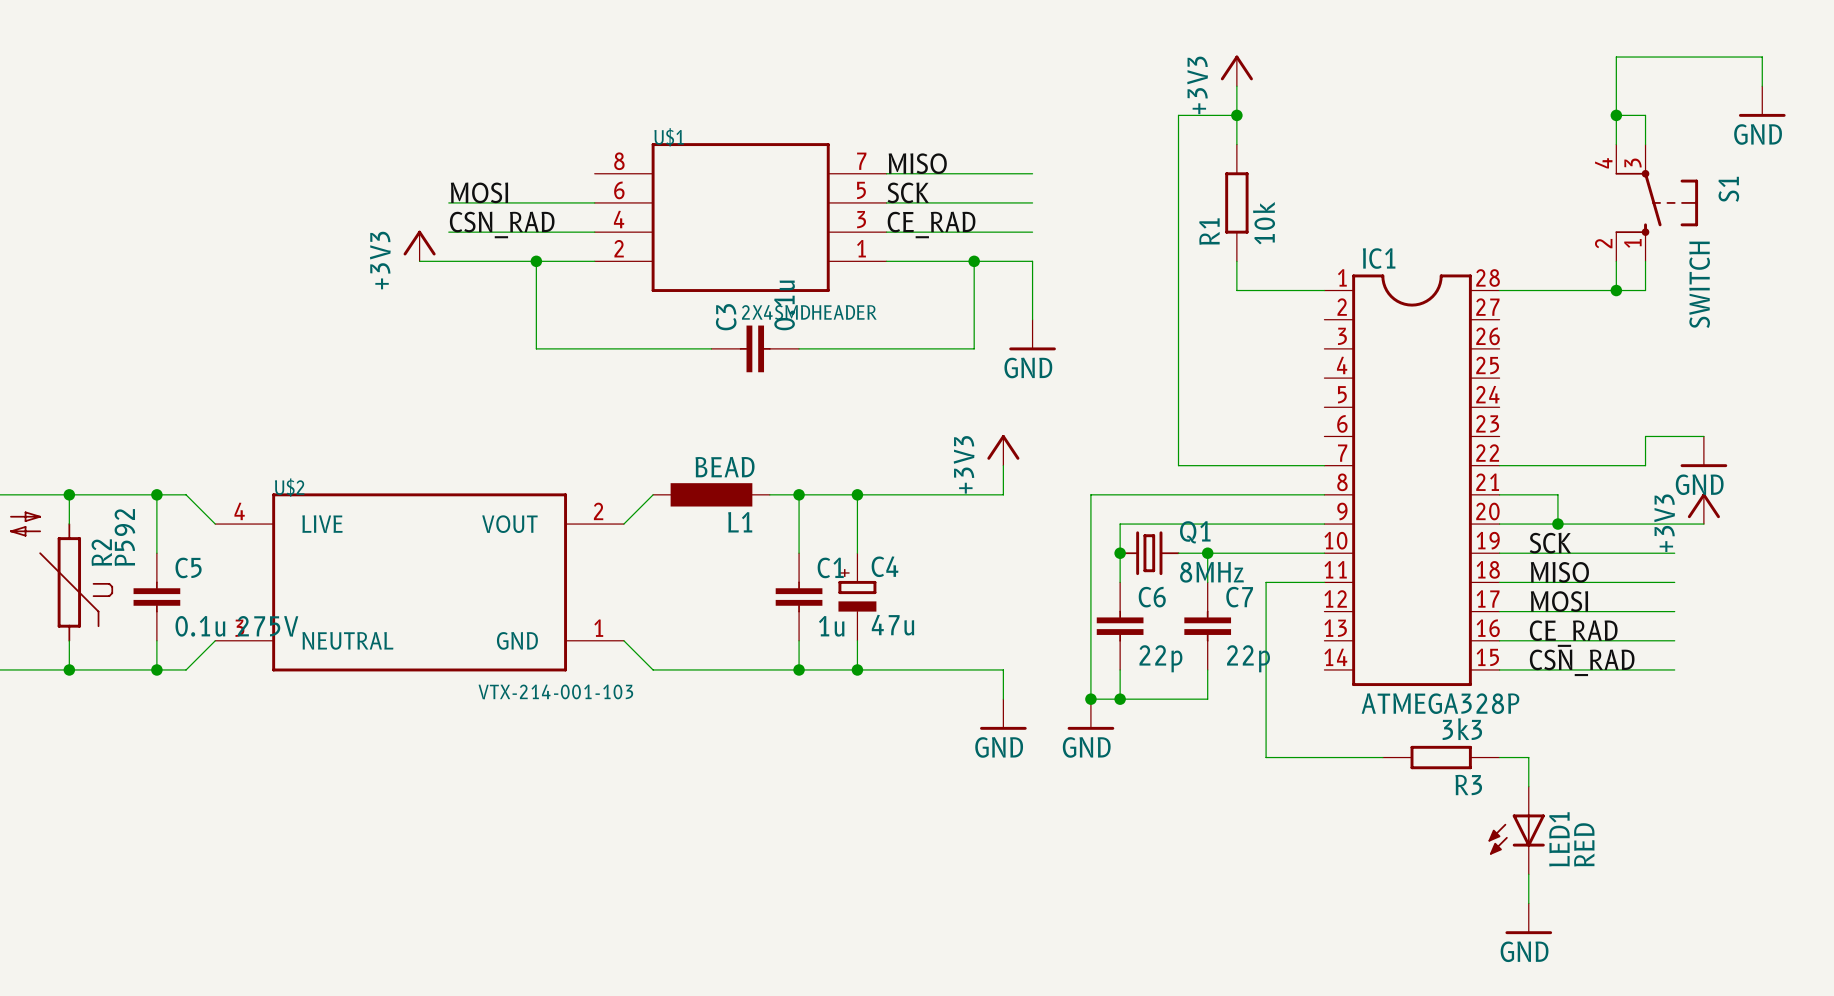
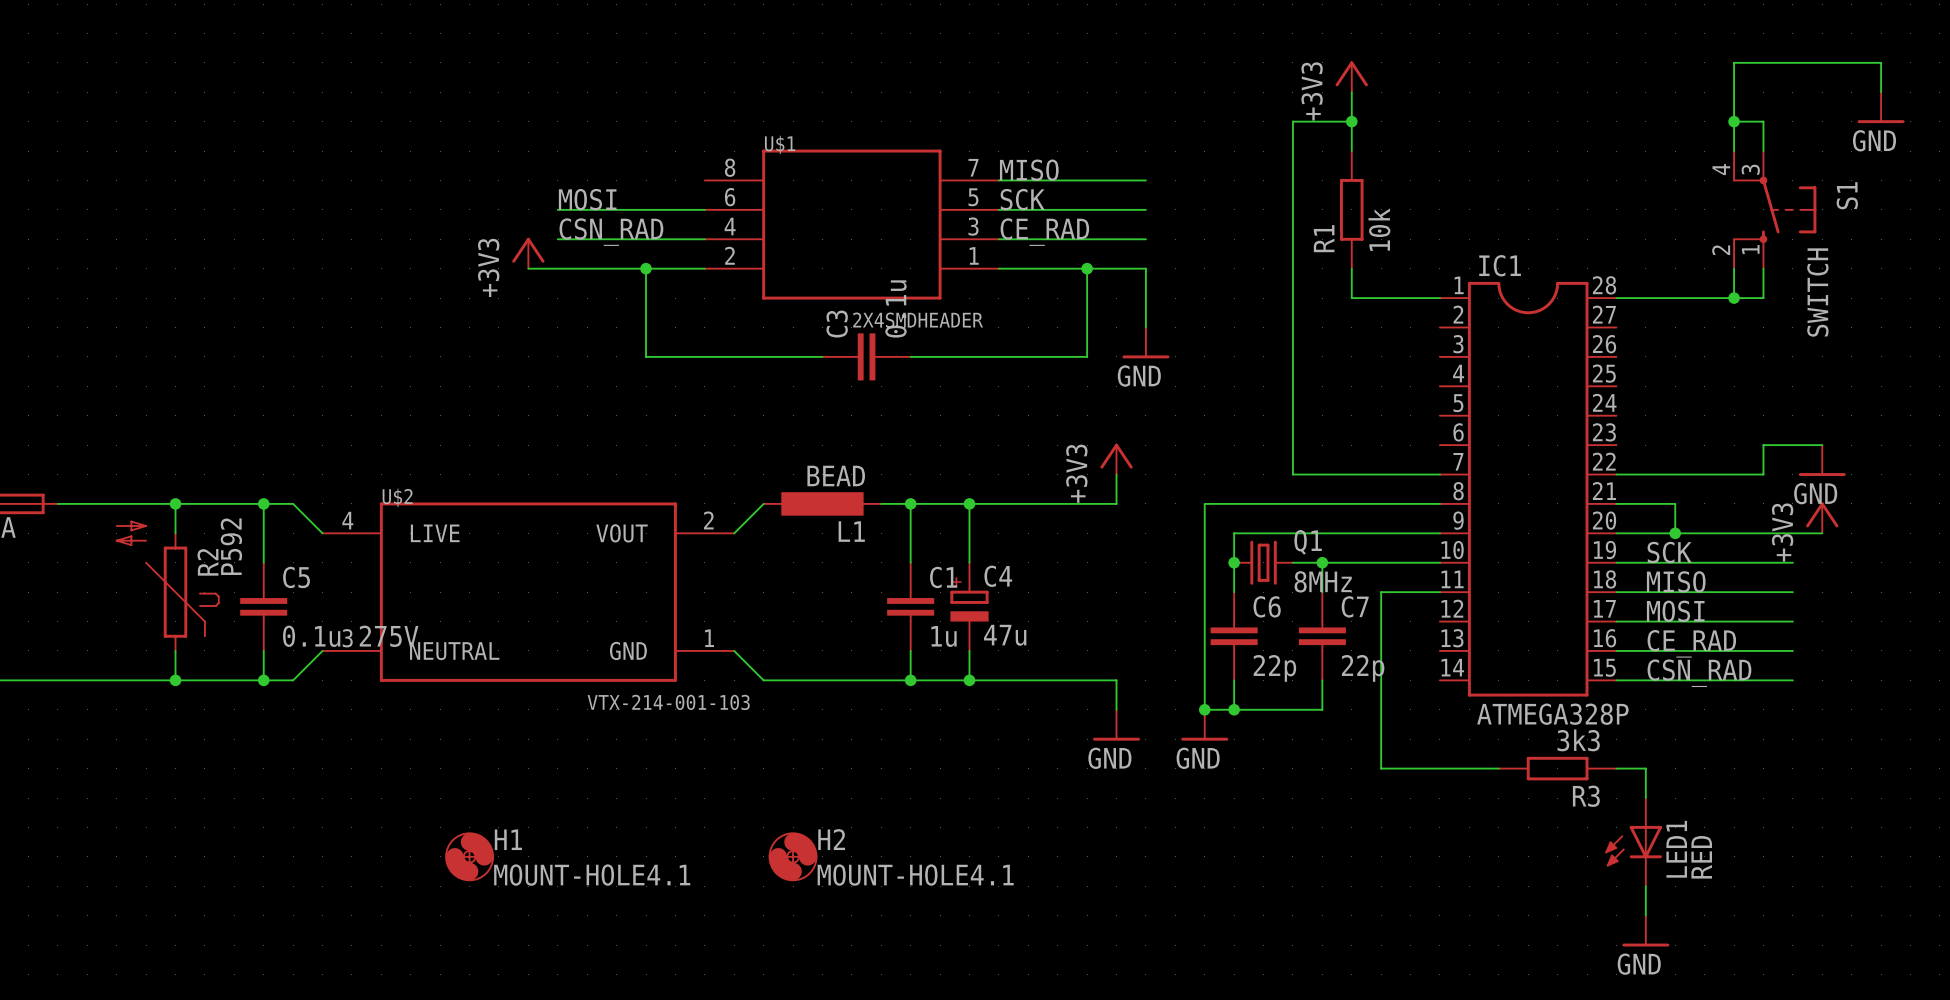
H1: none -> MOUNT-HOLE4.1 (469, 856)
H2: none -> MOUNT-HOLE4.1 (793, 856)

